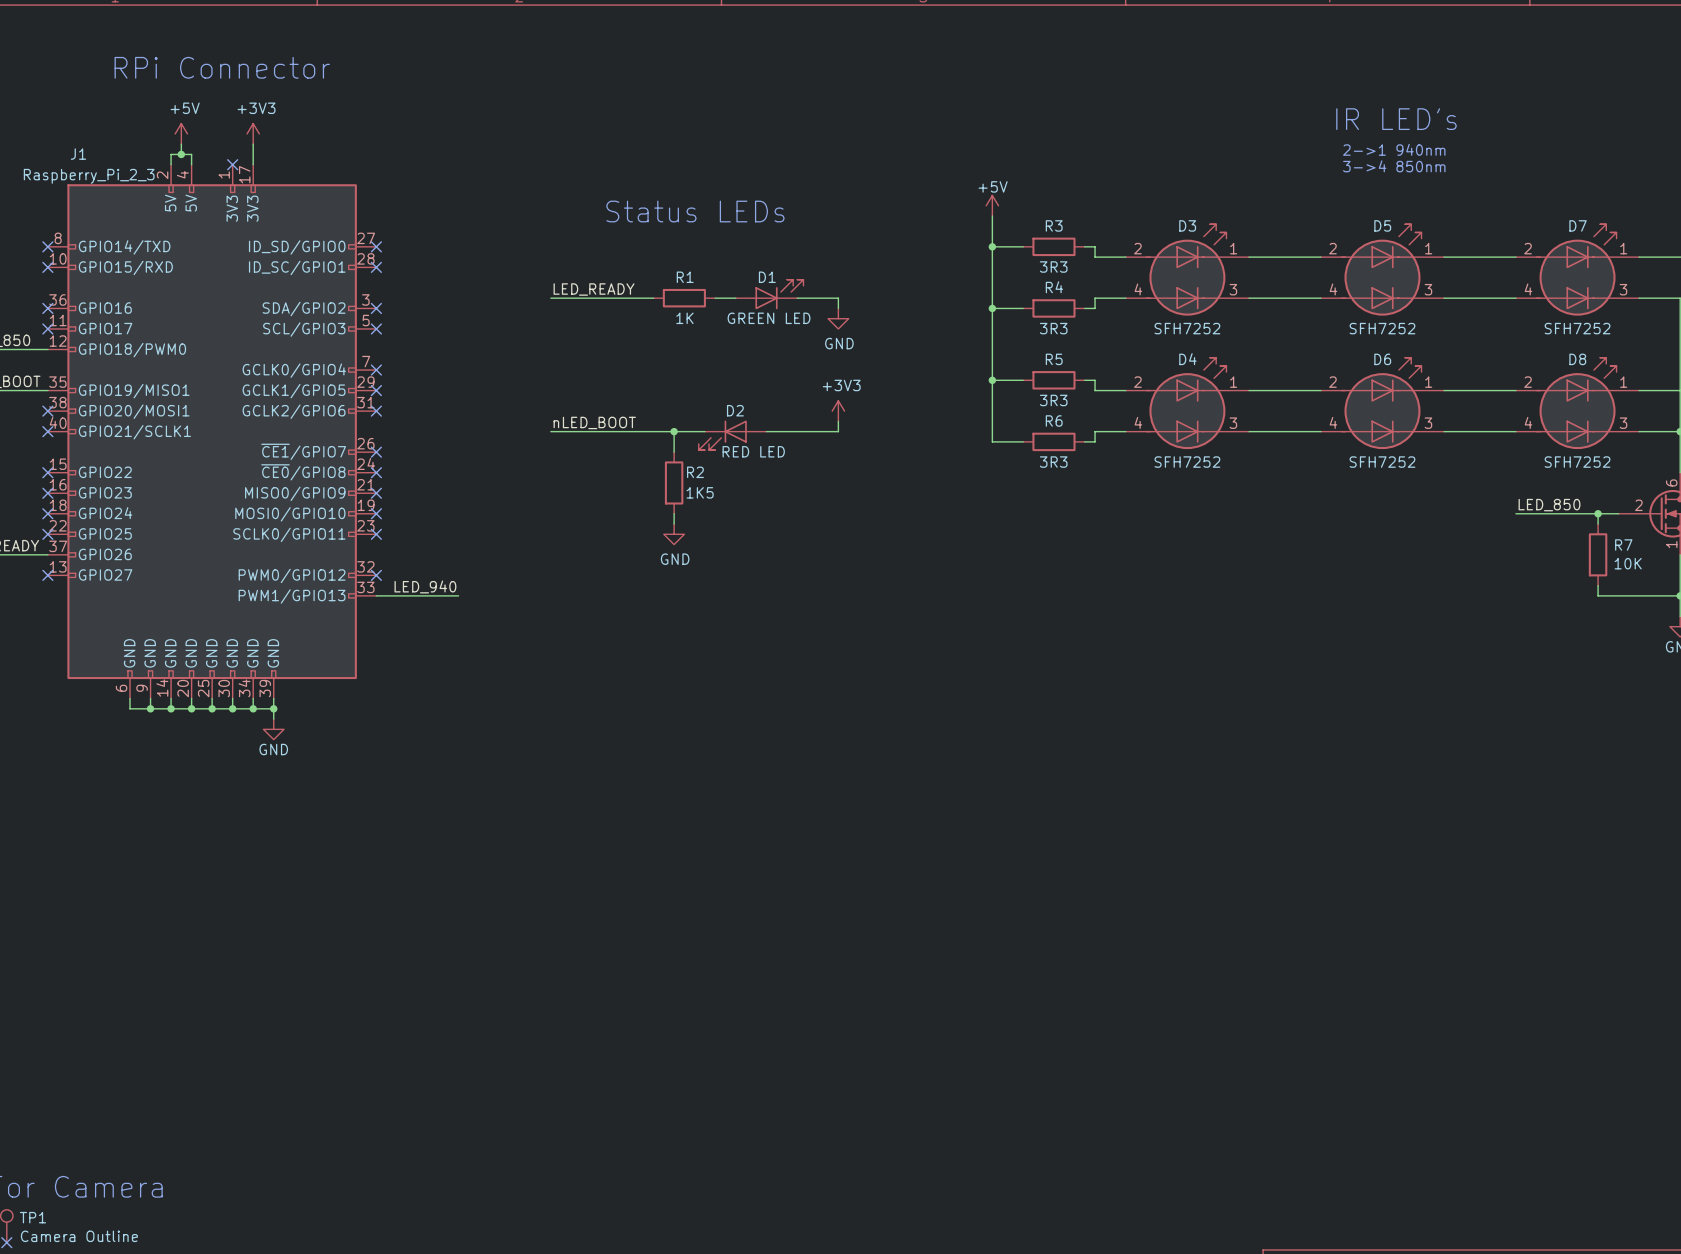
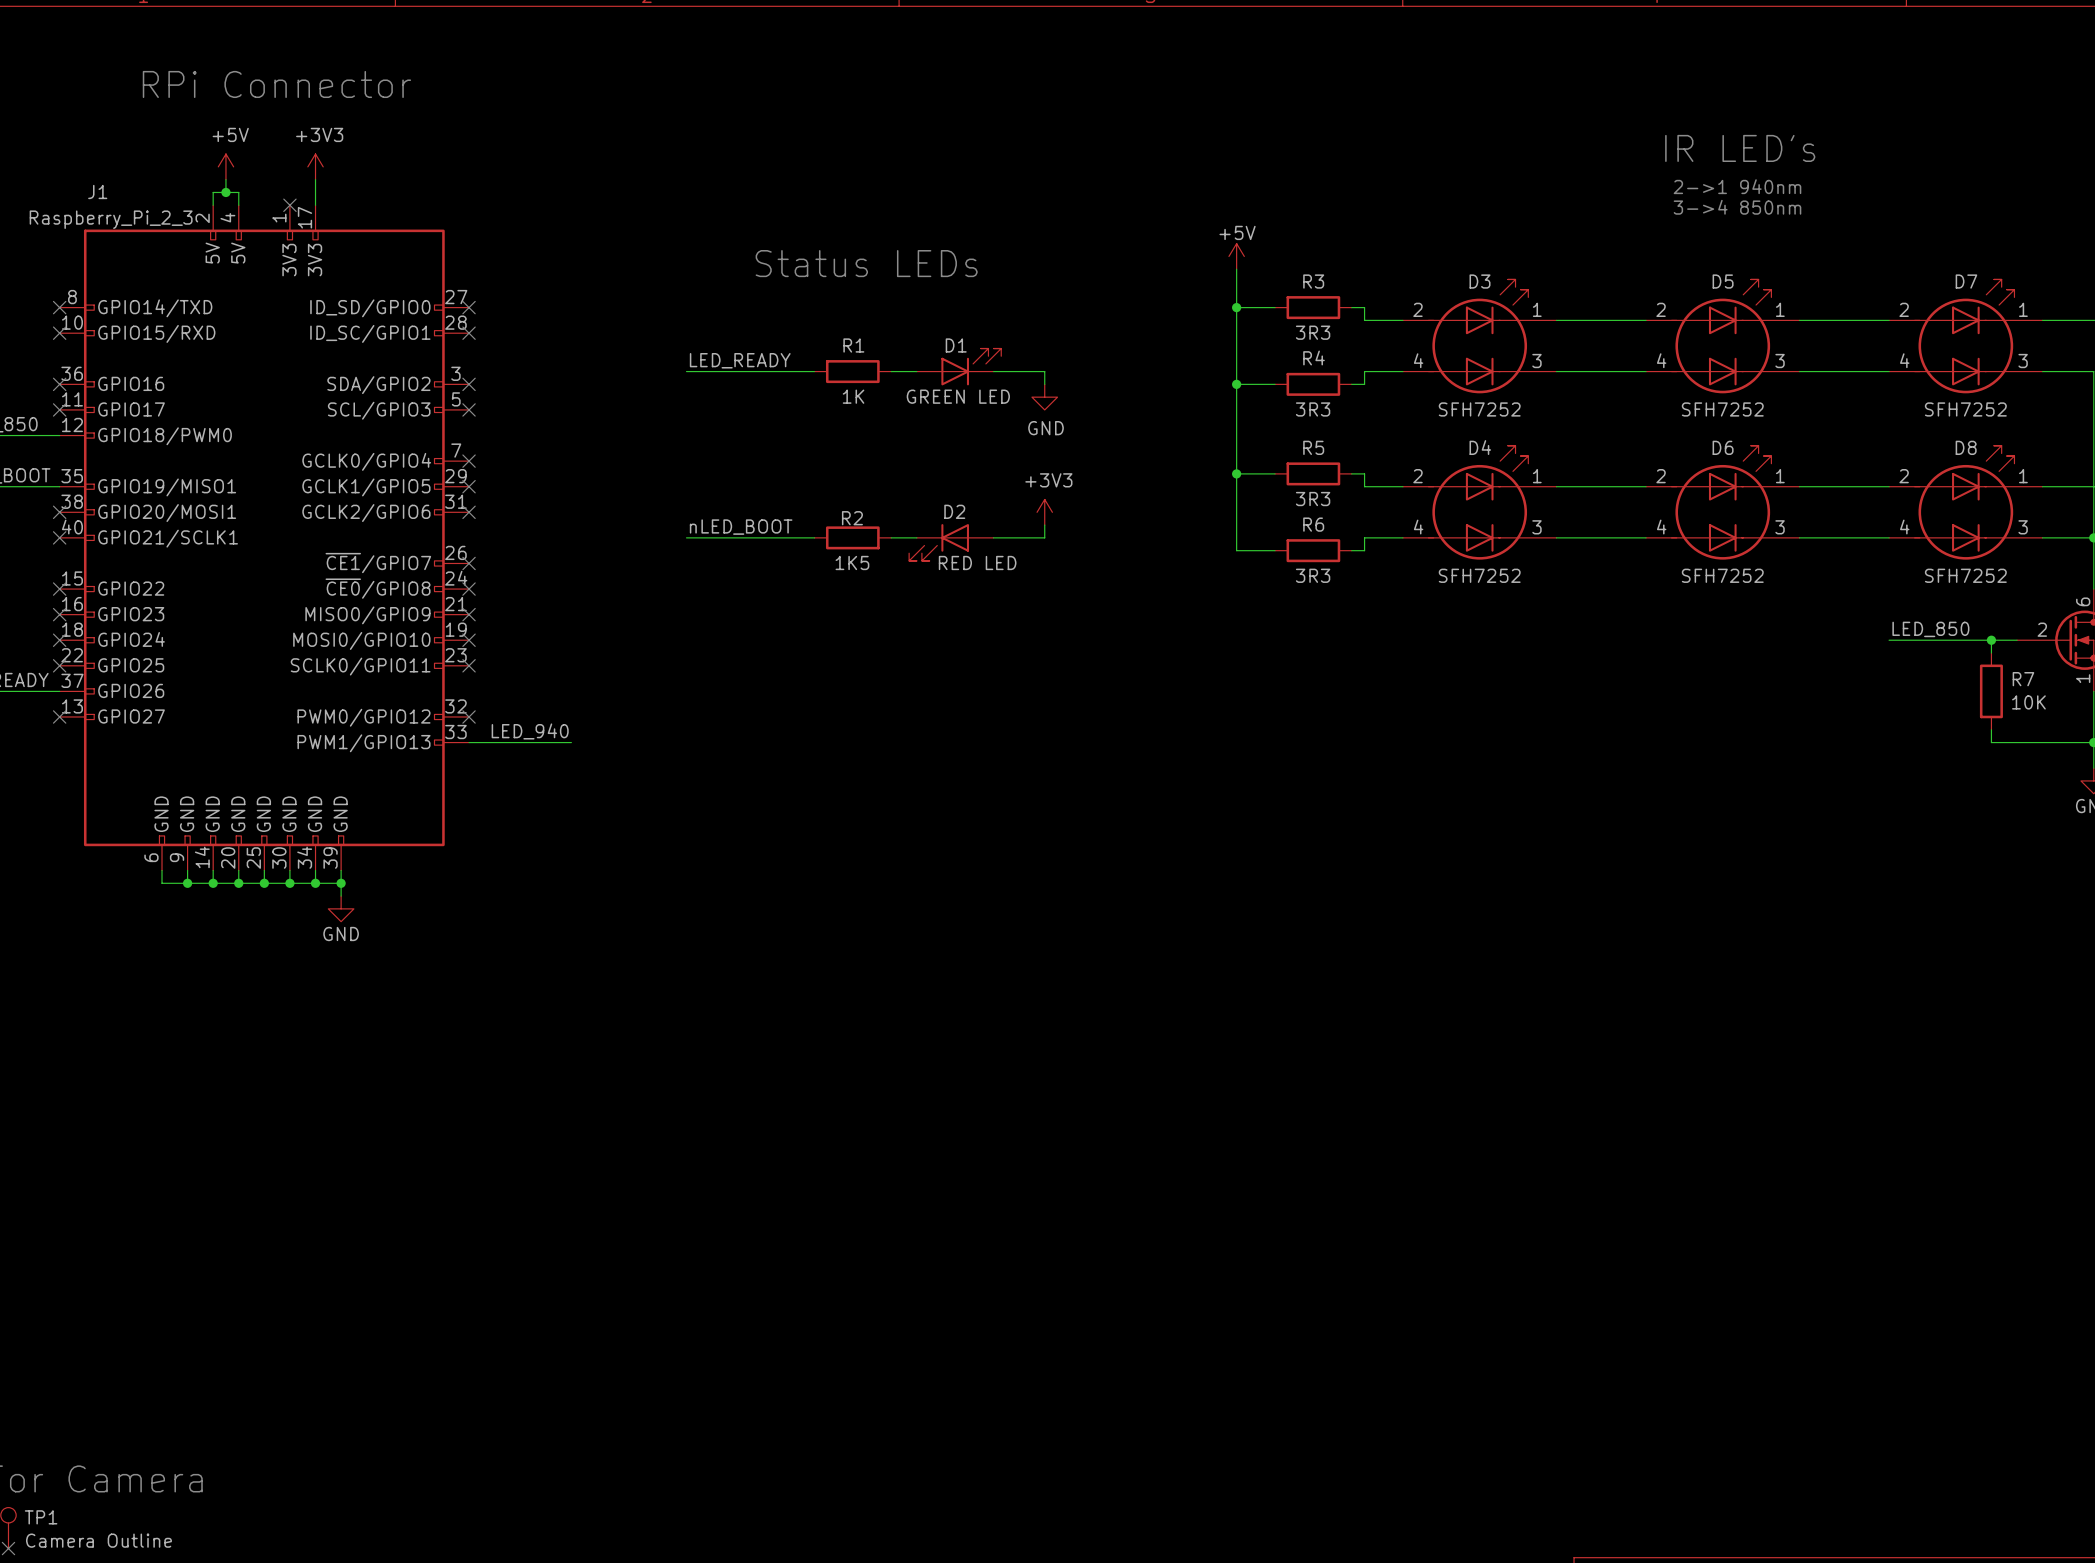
wire: (653, 431) (704, 431) -> none
wire: (674, 431) (674, 452) -> none
junction: (674, 431) -> none
D2 position: (732, 435) -> (951, 542)
R2 name position: R2 (695, 472) -> R2 (852, 518)
R2 rotation: 0° (674, 482) -> 90° clockwise (852, 537)
R2 position: (674, 482) -> (852, 537)
wire: (674, 513) (674, 524) -> none
power symbol: GND (674, 534) -> none

